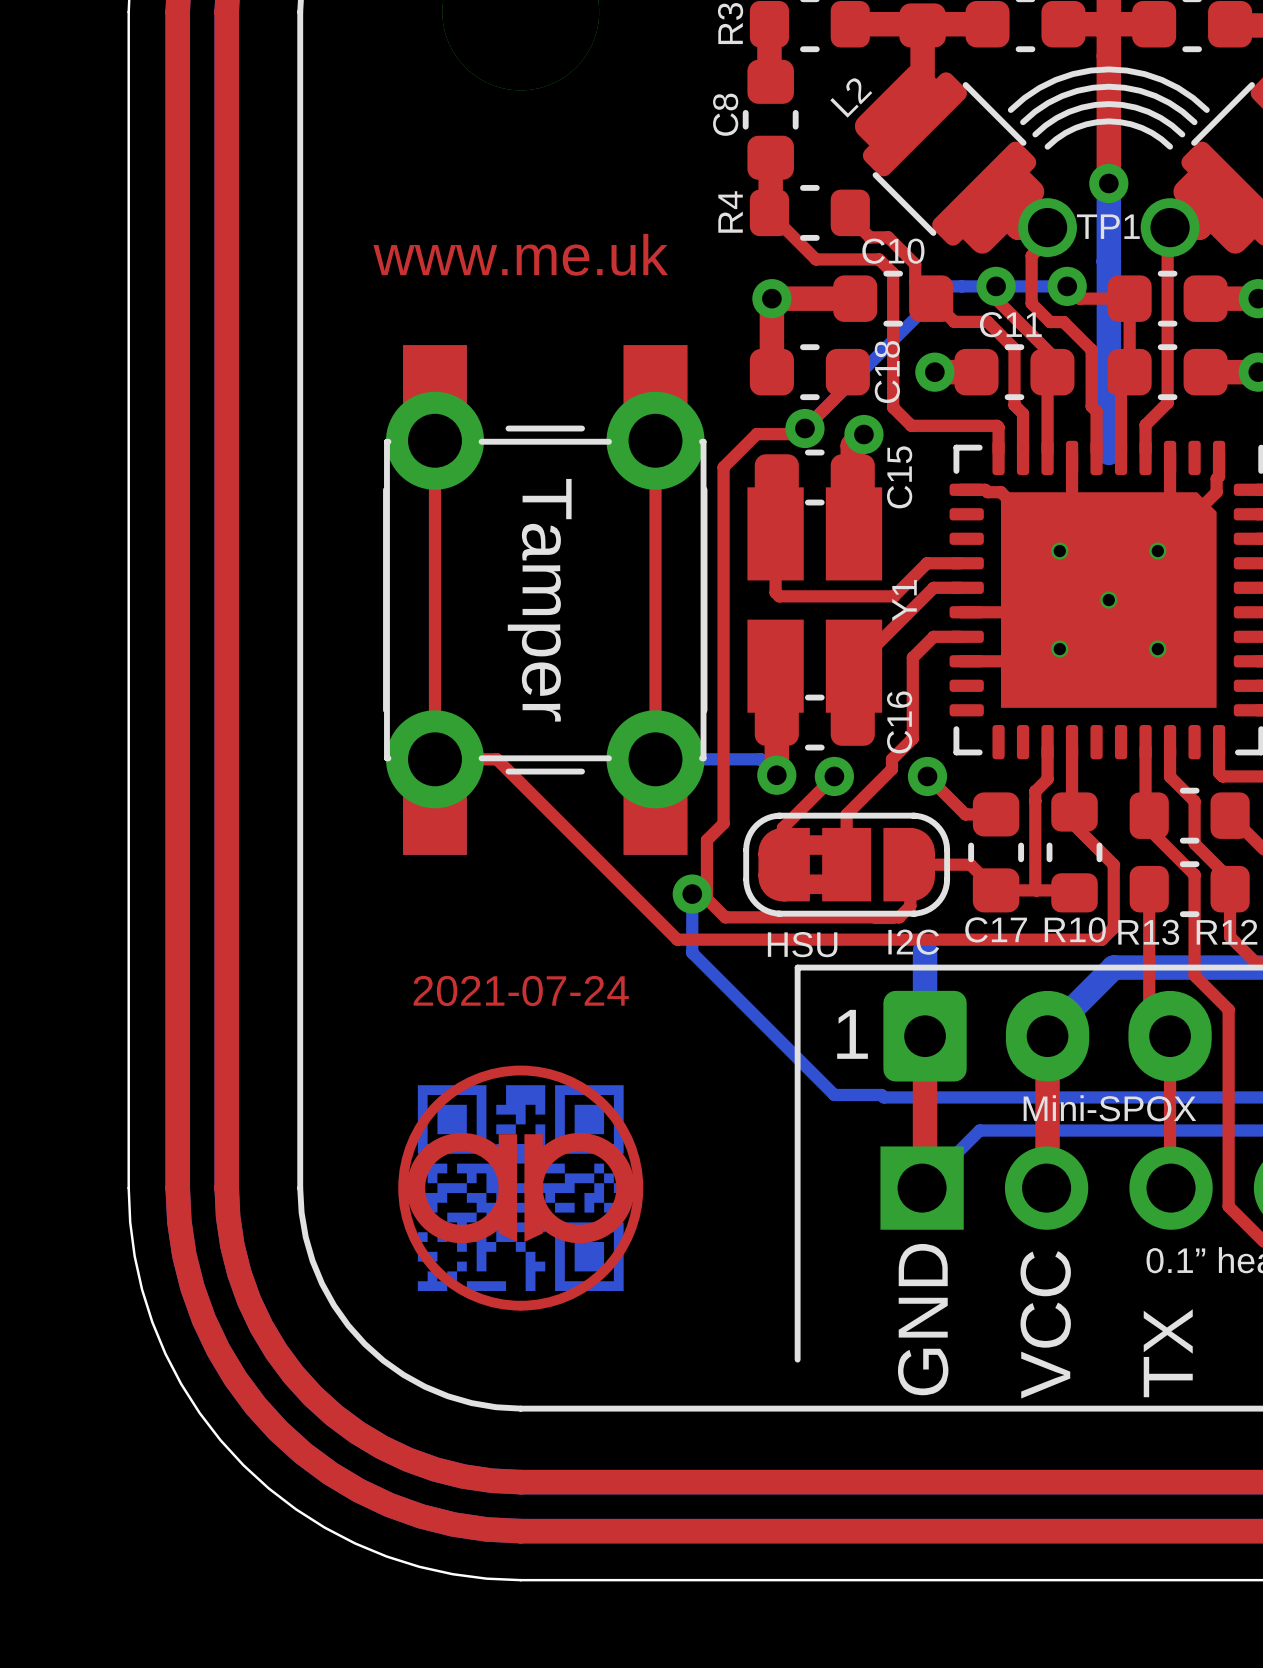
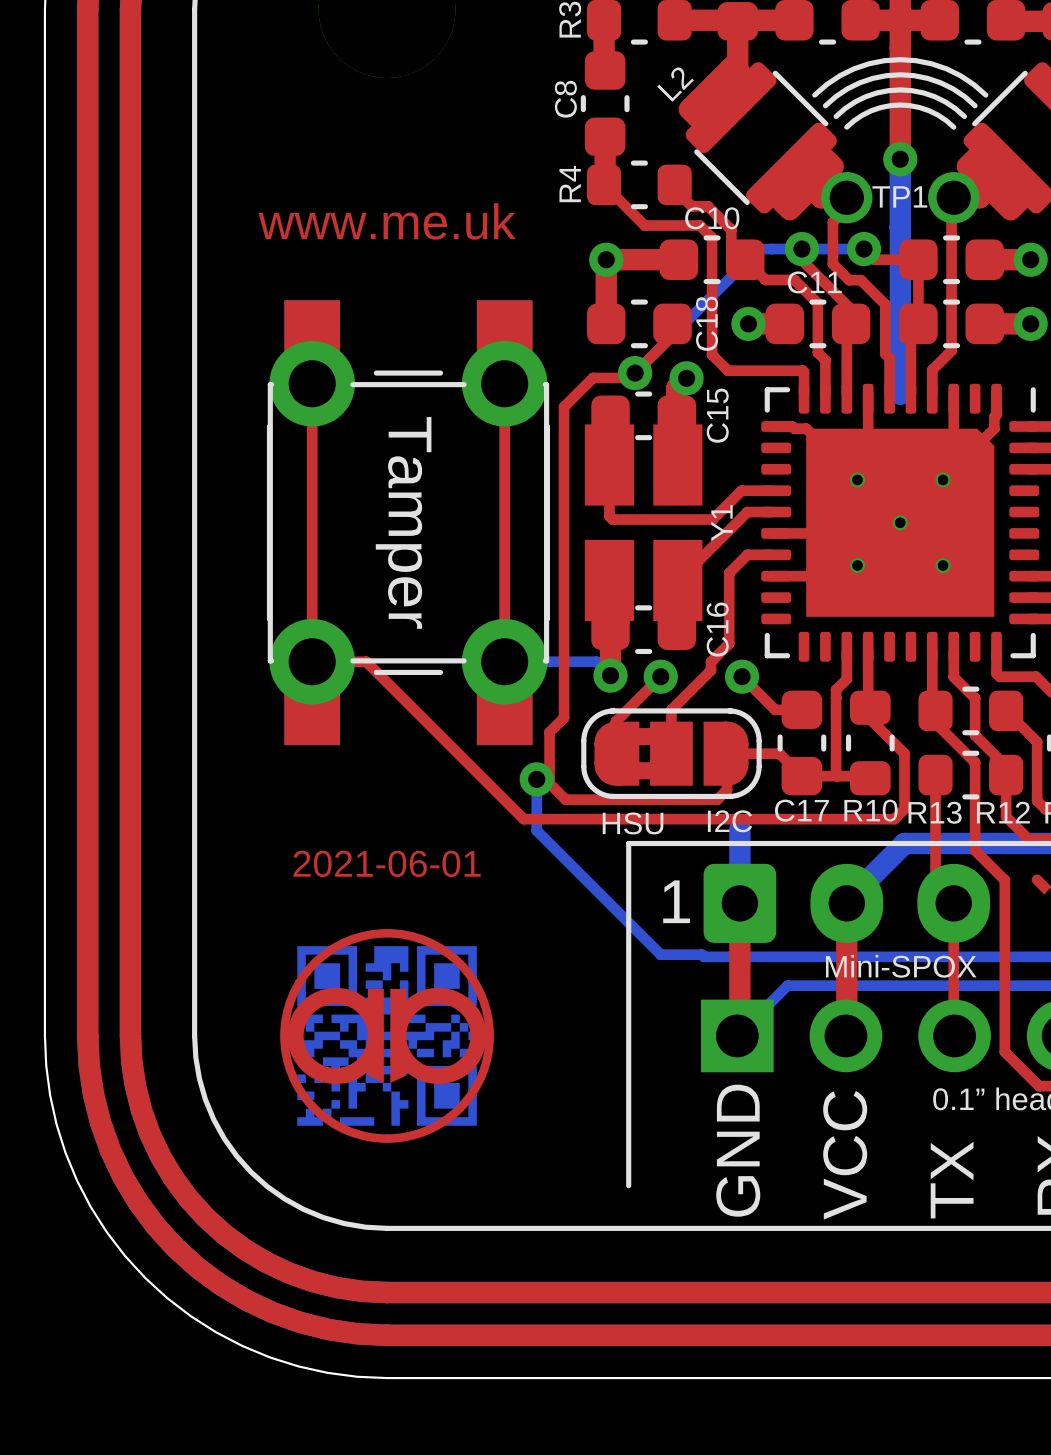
text: 2021-07-24 (521, 990) -> 2021-06-01 (387, 863)

